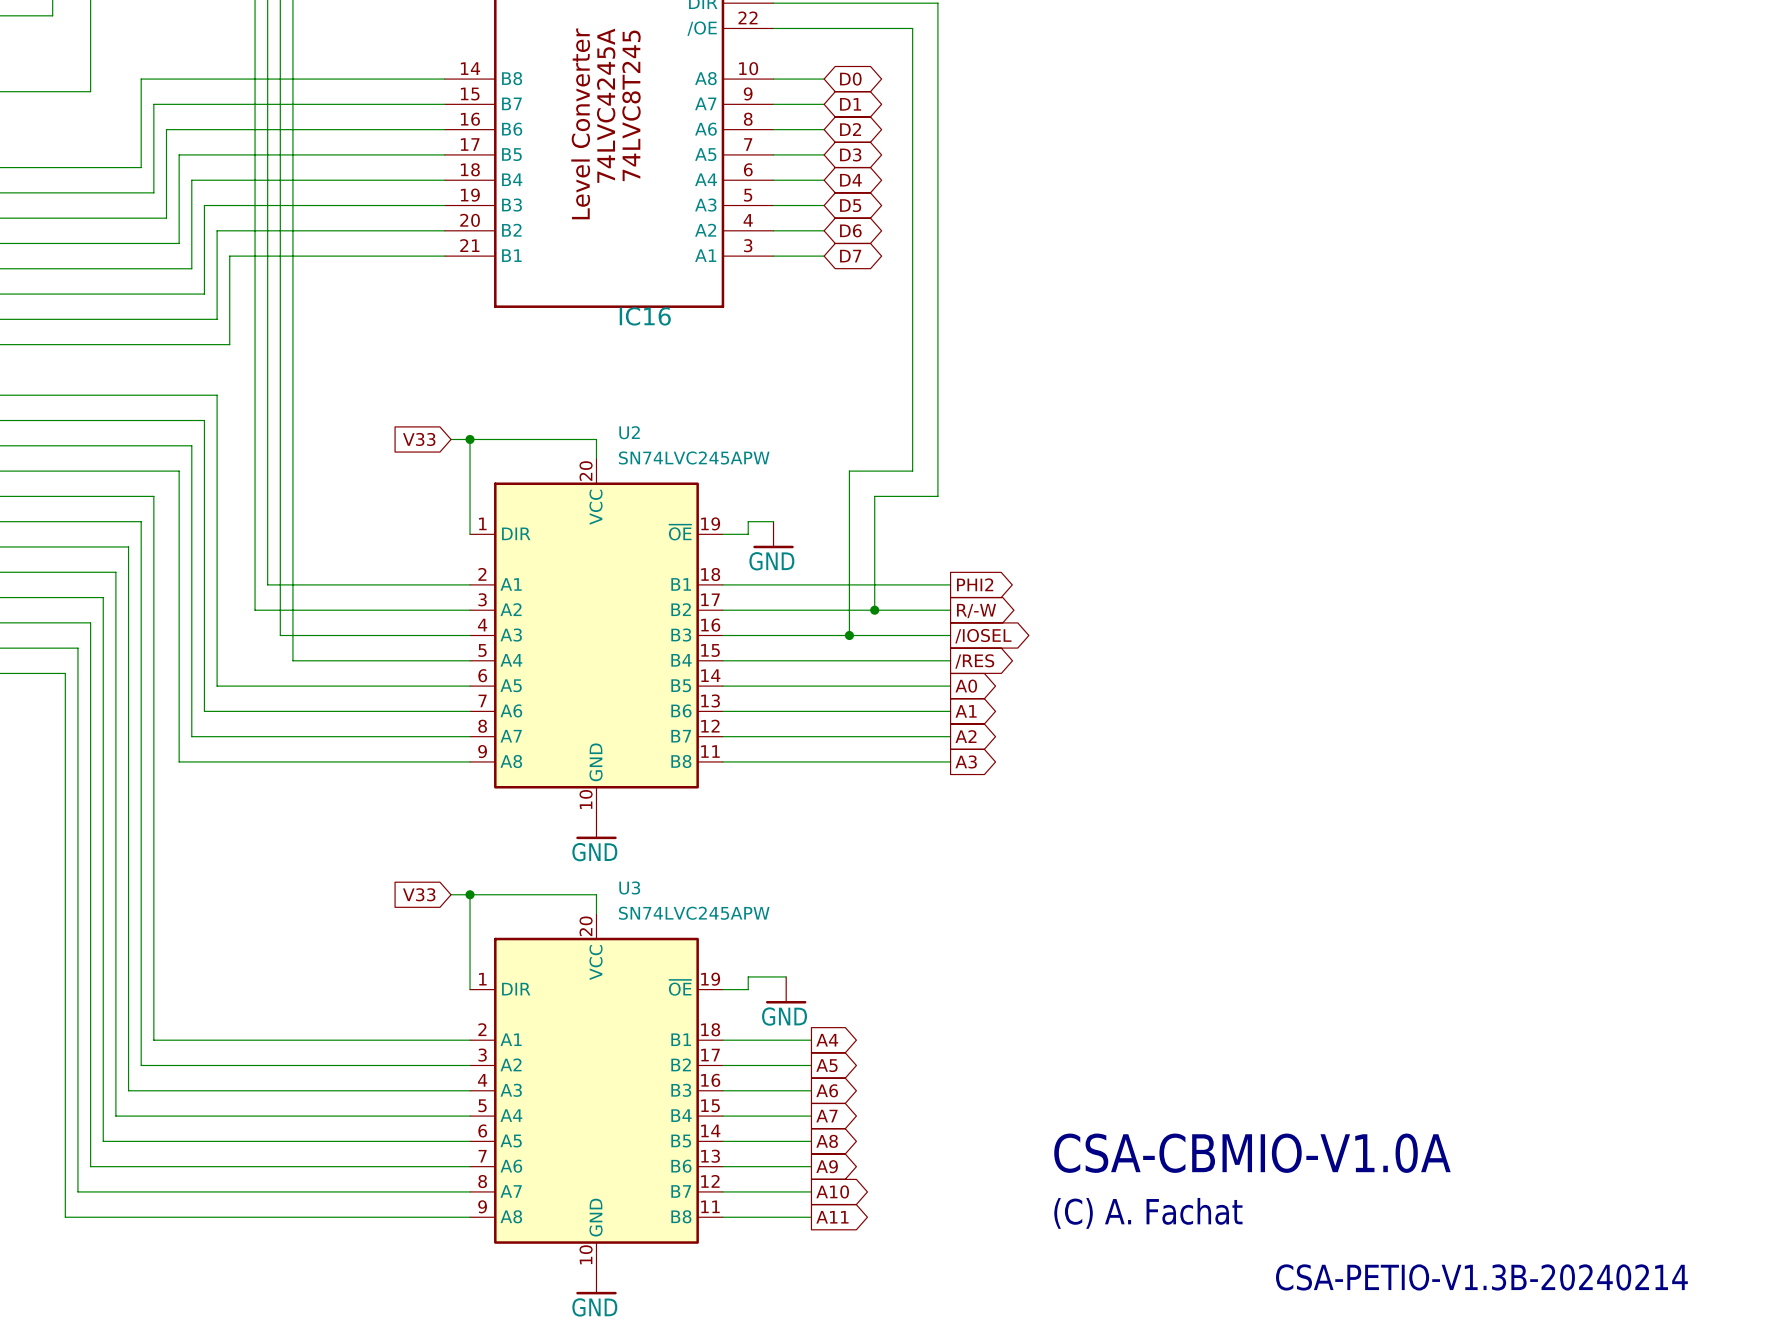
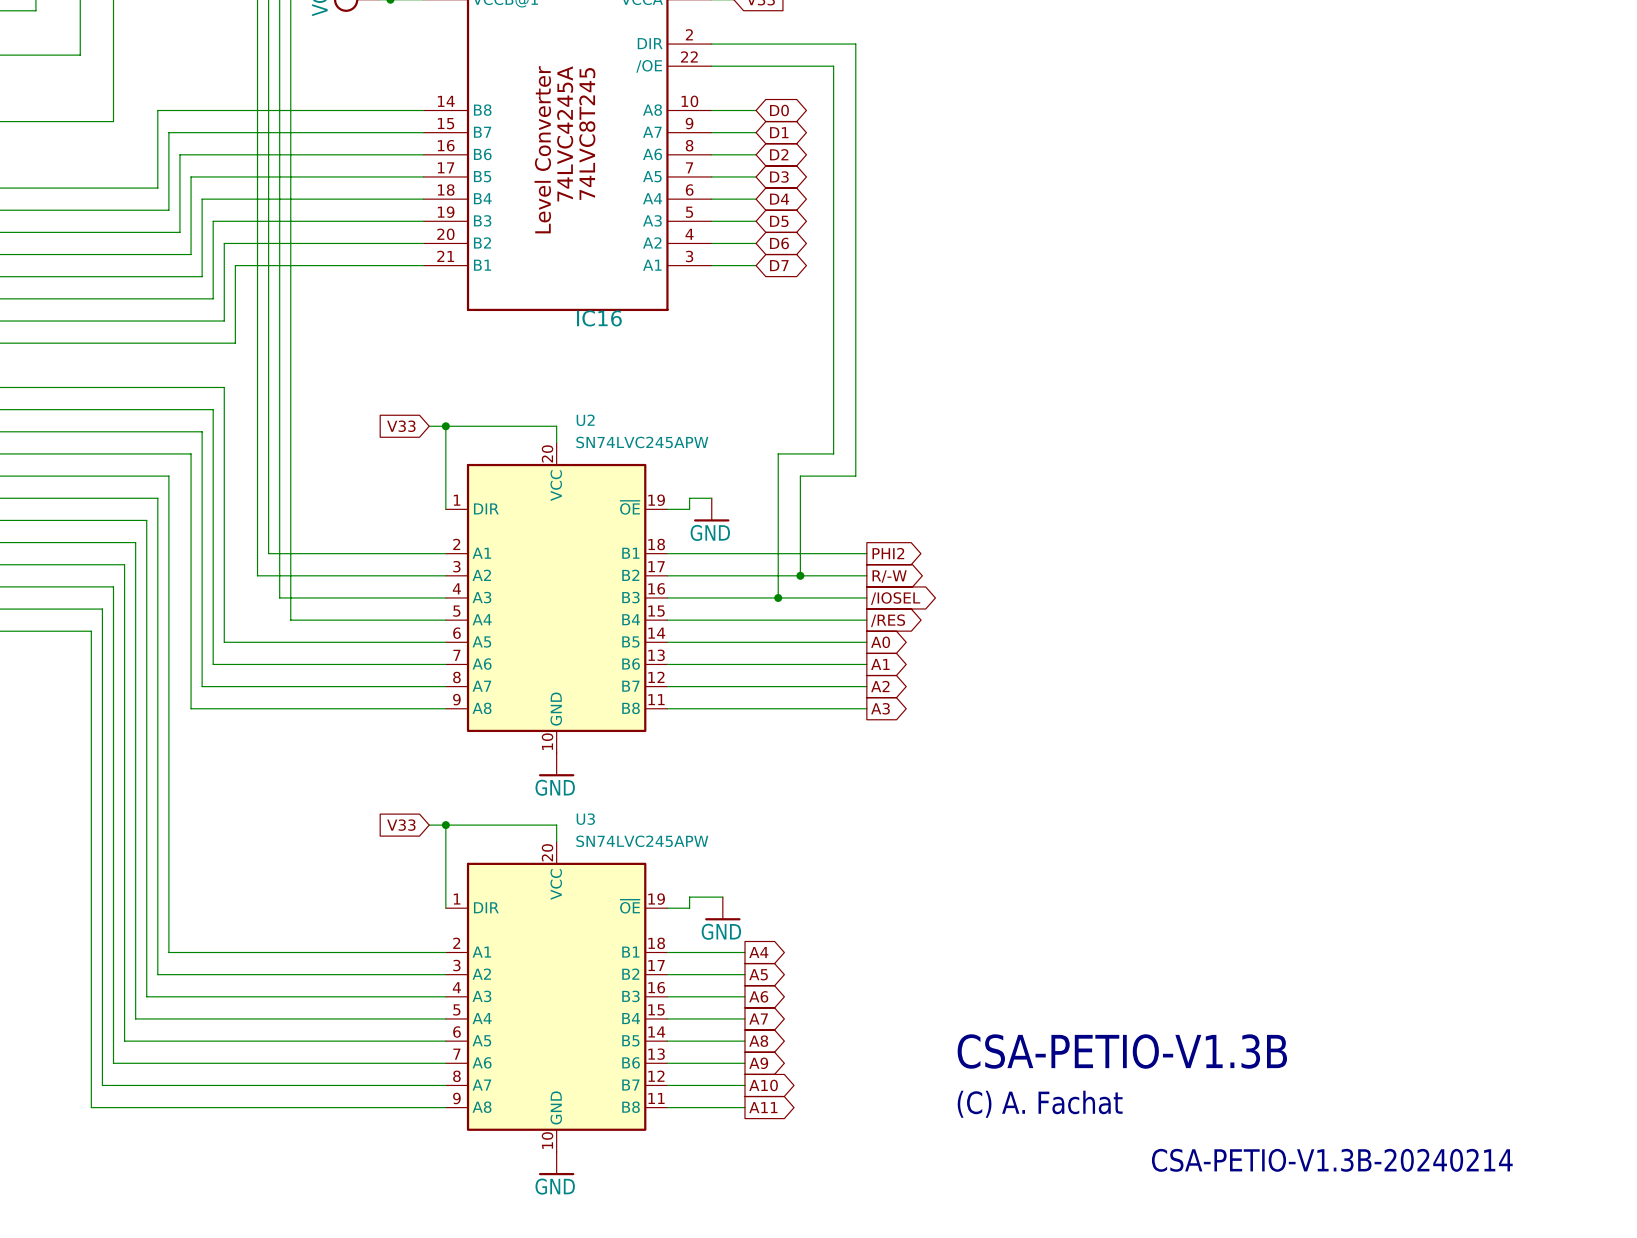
text: CSA-CBMIO-V1.0A (1252, 1153) -> CSA-PETIO-V1.3B (1122, 1051)

